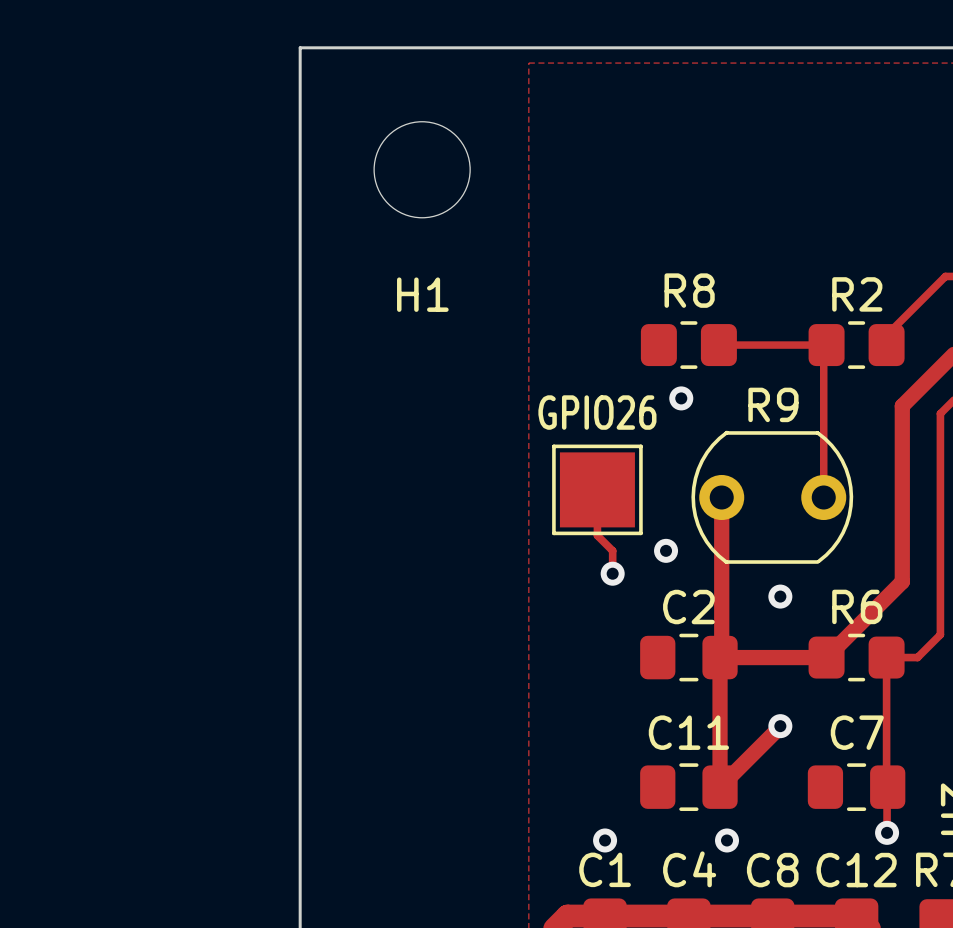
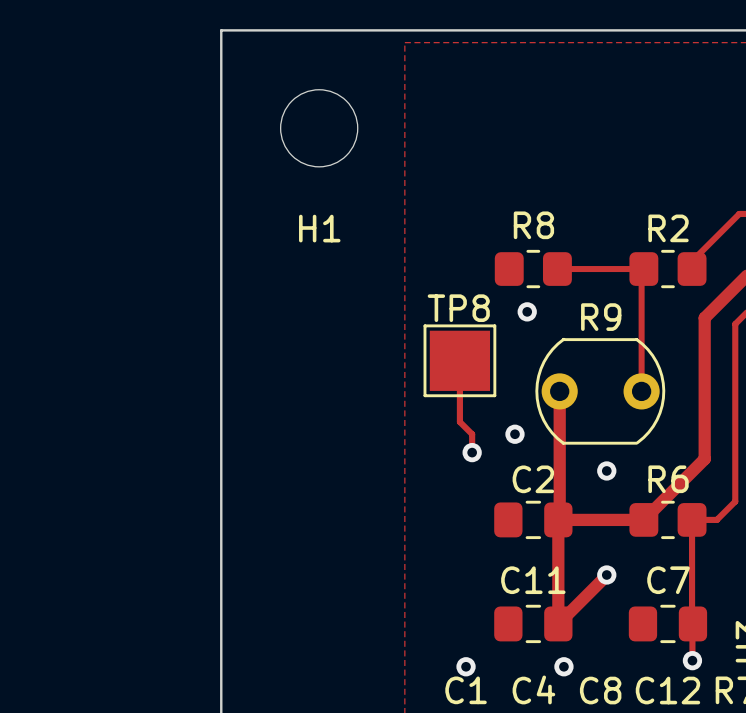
text: GPIO26 (597, 412) -> none
TP8: none -> (459, 360)
part: (597, 489) -> none

